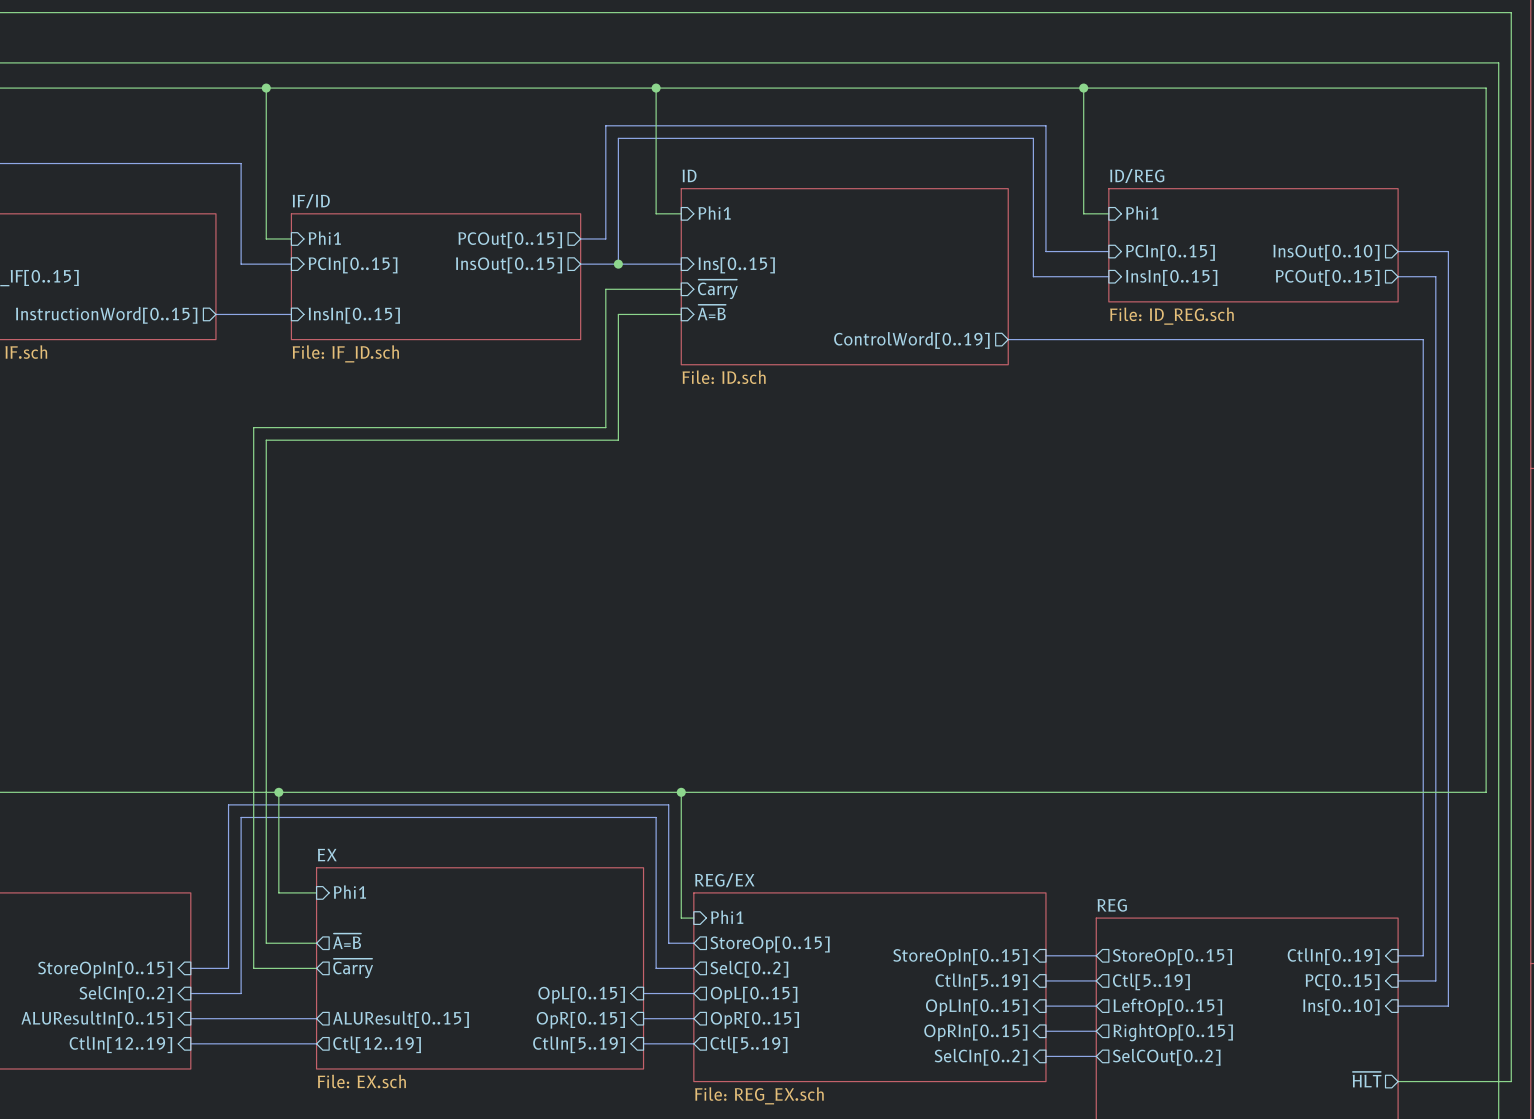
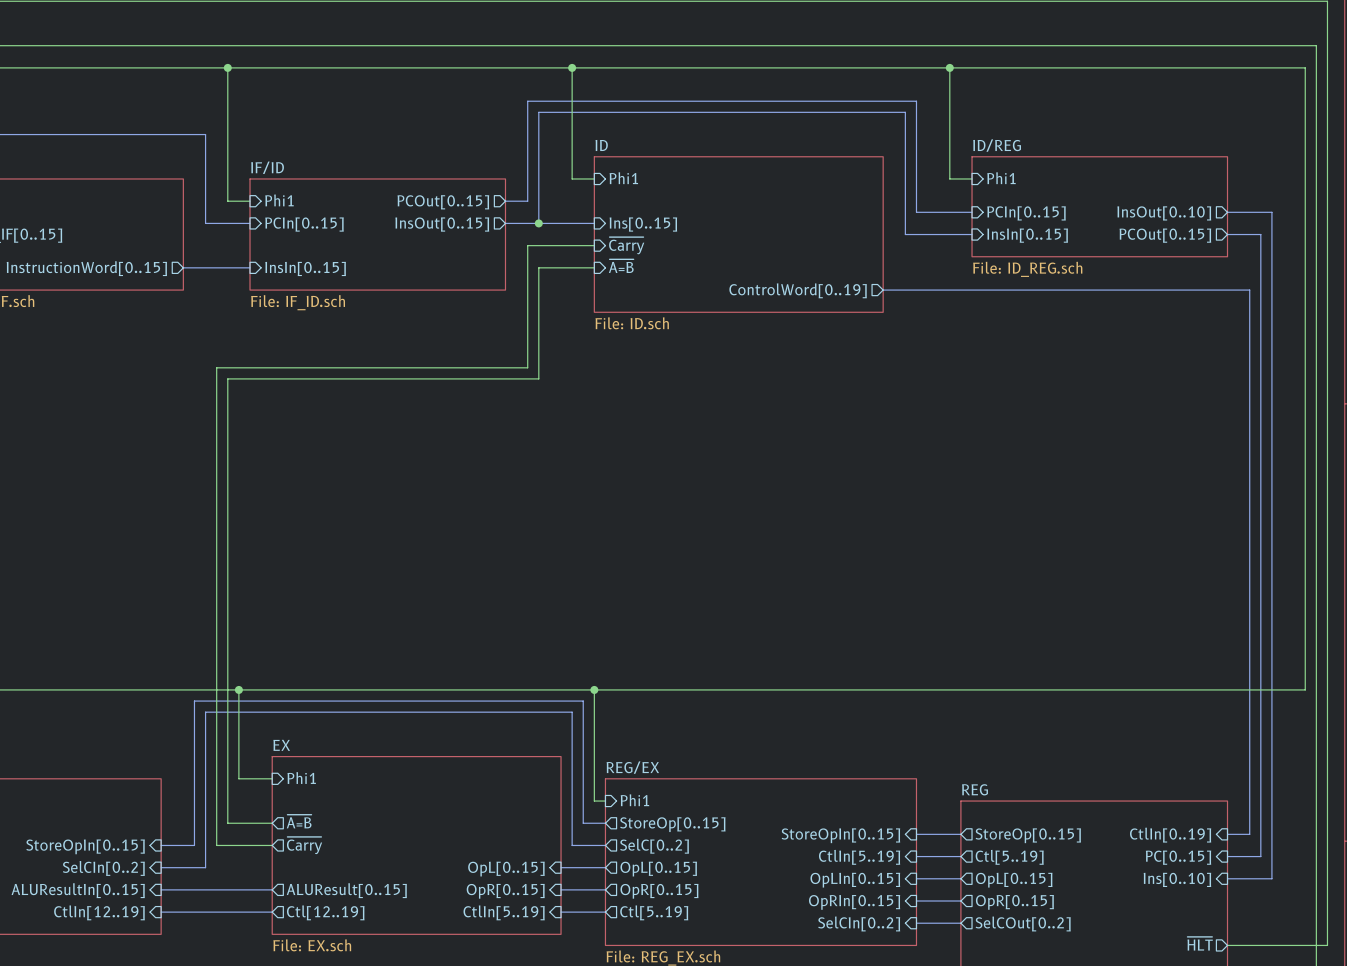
sheet pin: LeftOp[0..15] (1167, 1007) -> OpL[0..15] (1014, 880)
sheet pin: RightOp[0..15] (1173, 1032) -> OpR[0..15] (1014, 902)

